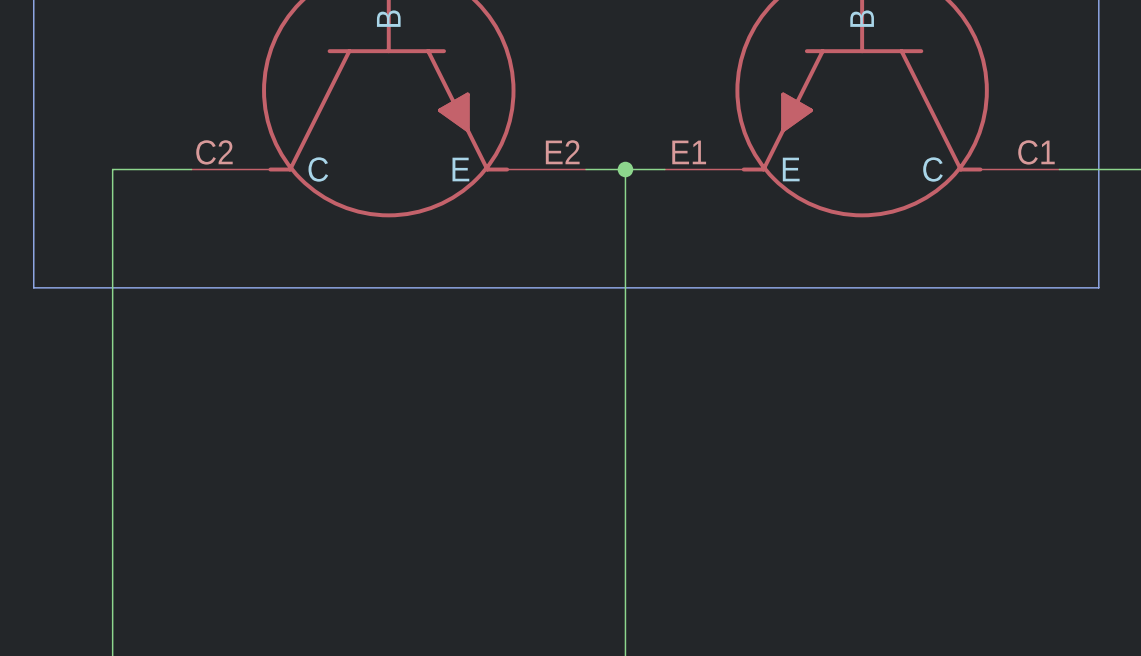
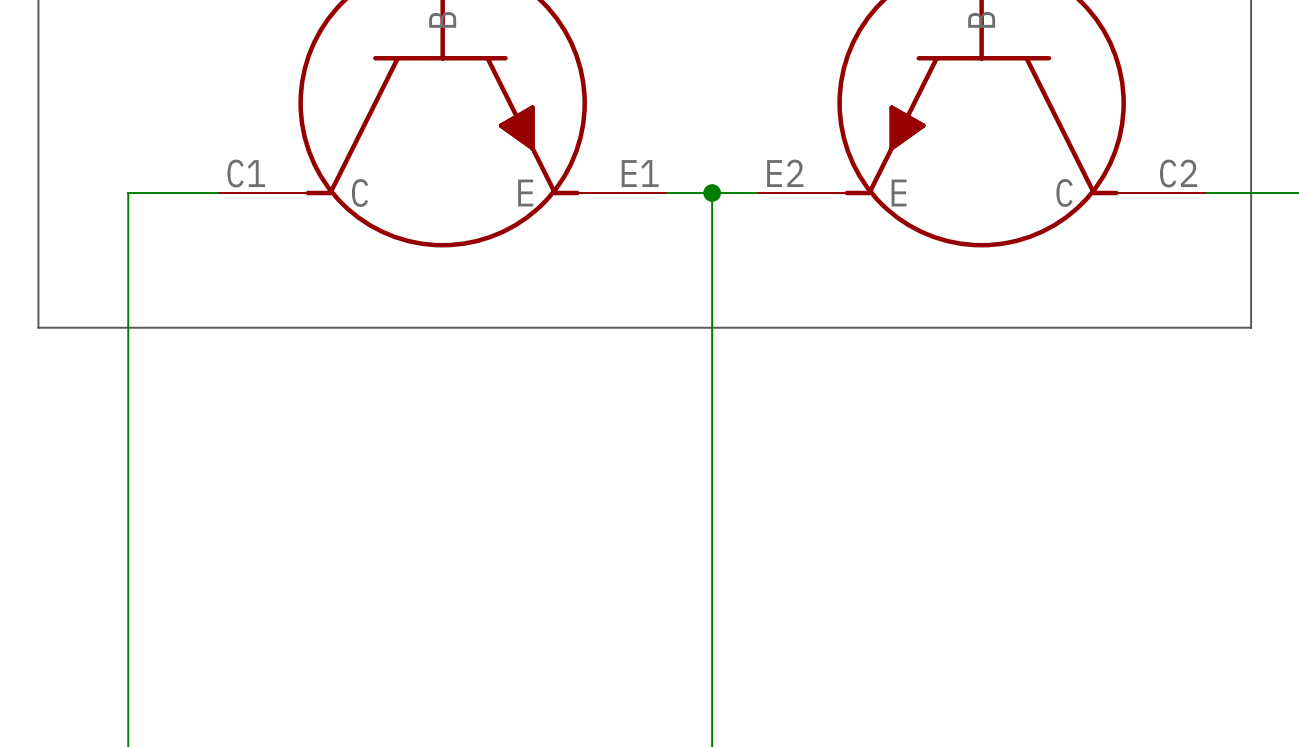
part pin number: C2 (214, 152) -> C1 (246, 173)
part pin number: E2 (562, 152) -> E1 (640, 173)
part pin number: E1 (689, 152) -> E2 (785, 173)
part pin number: C1 (1036, 152) -> C2 (1178, 173)

